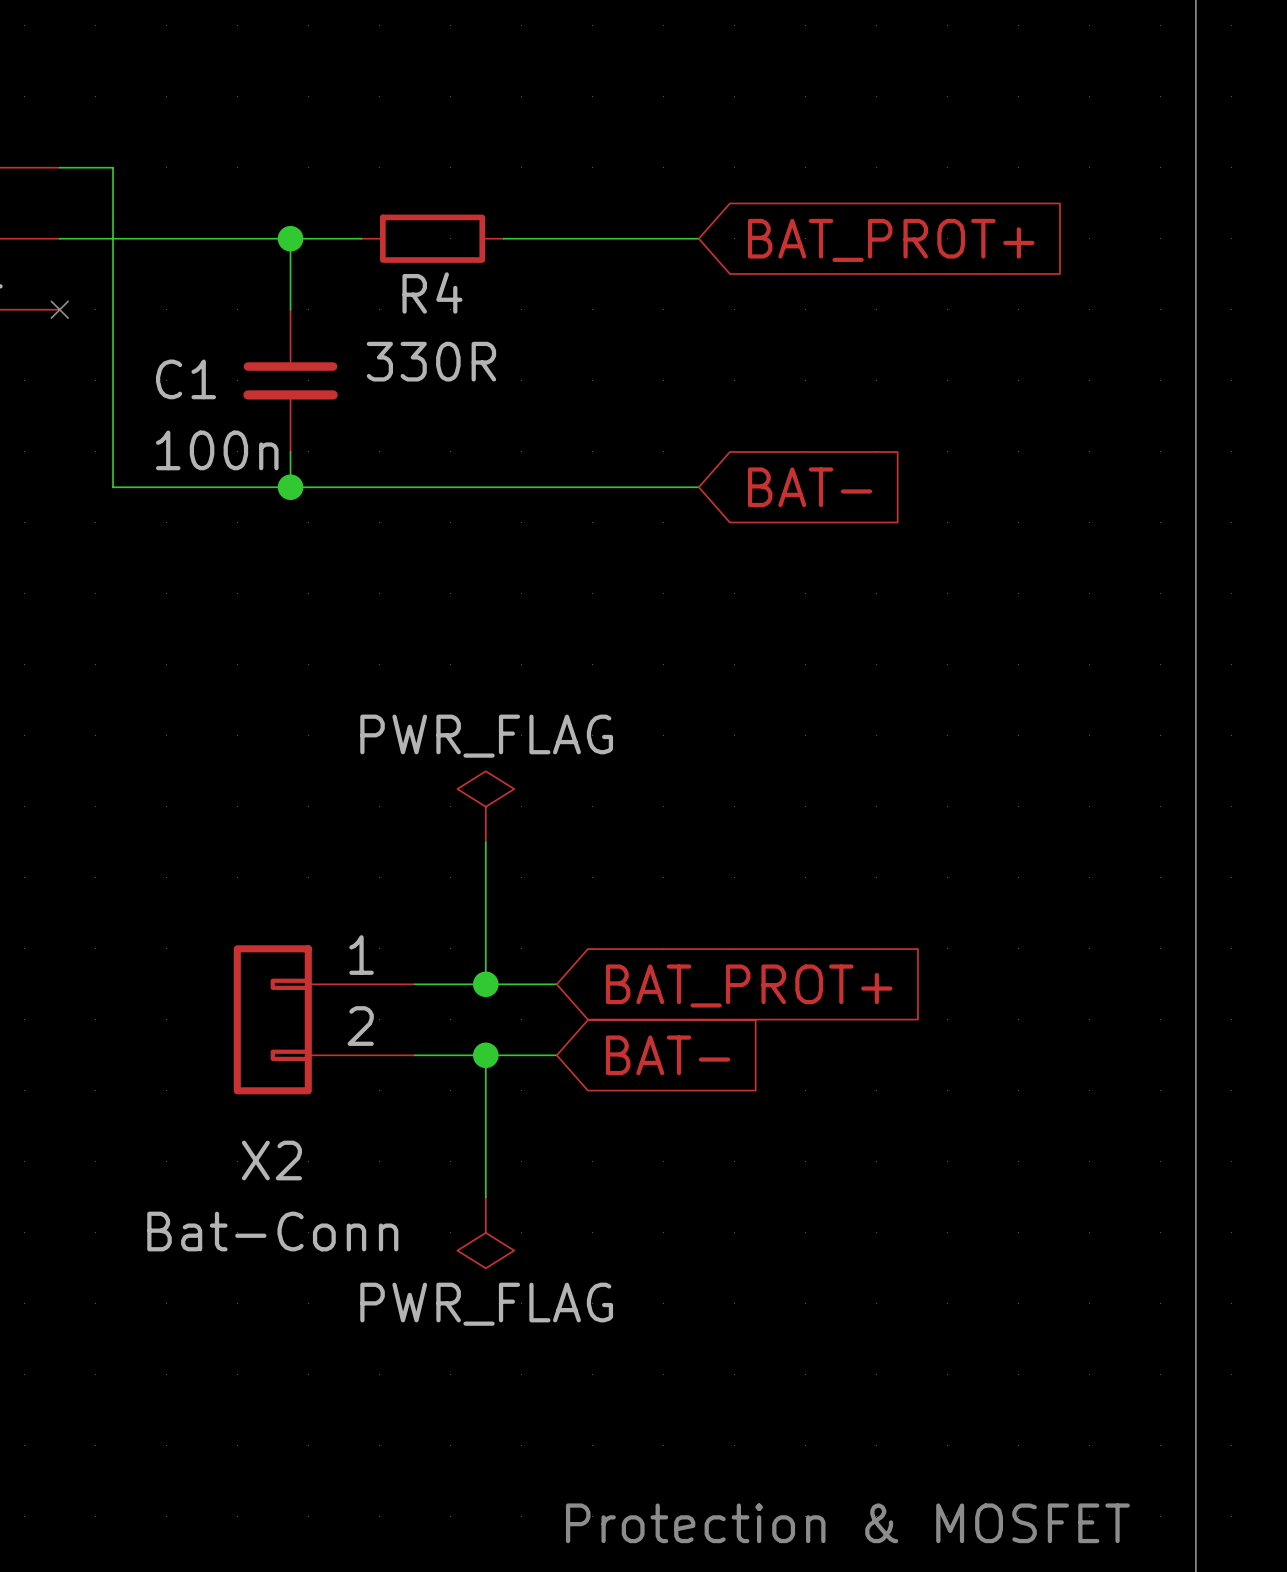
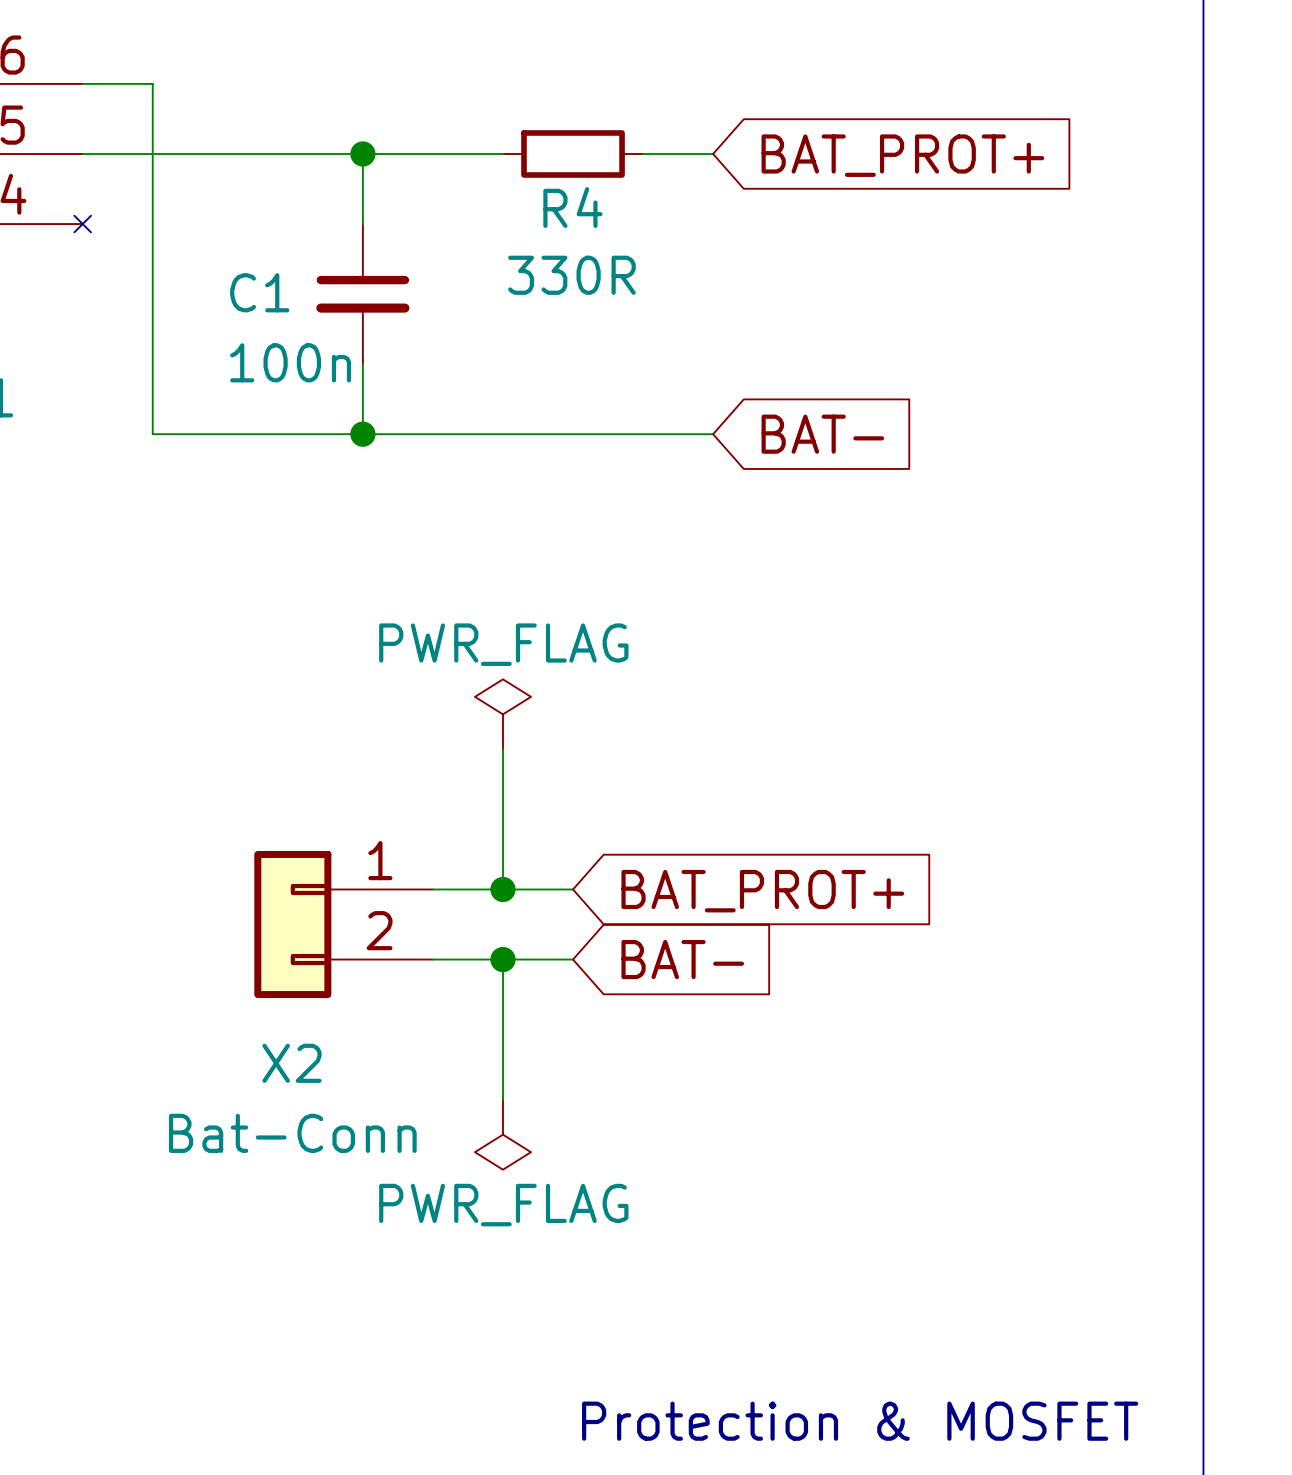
wire: (113, 167) (113, 487) (698, 487) -> (135, 83) (152, 83) (152, 434) (713, 434)
wire: (290, 238) (290, 309) -> (362, 153) (362, 224)
junction position: (290, 238) -> (362, 153)
R4 position: (432, 238) -> (573, 153)
wire: (503, 238) (627, 238) -> (380, 153) (502, 153)
C1 position: (290, 380) -> (362, 294)
wire: (290, 451) (290, 487) -> none
wire: none -> (362, 364) (362, 434)
junction position: (290, 487) -> (362, 434)
global label position: BAT- (810, 487) -> BAT- (822, 434)

